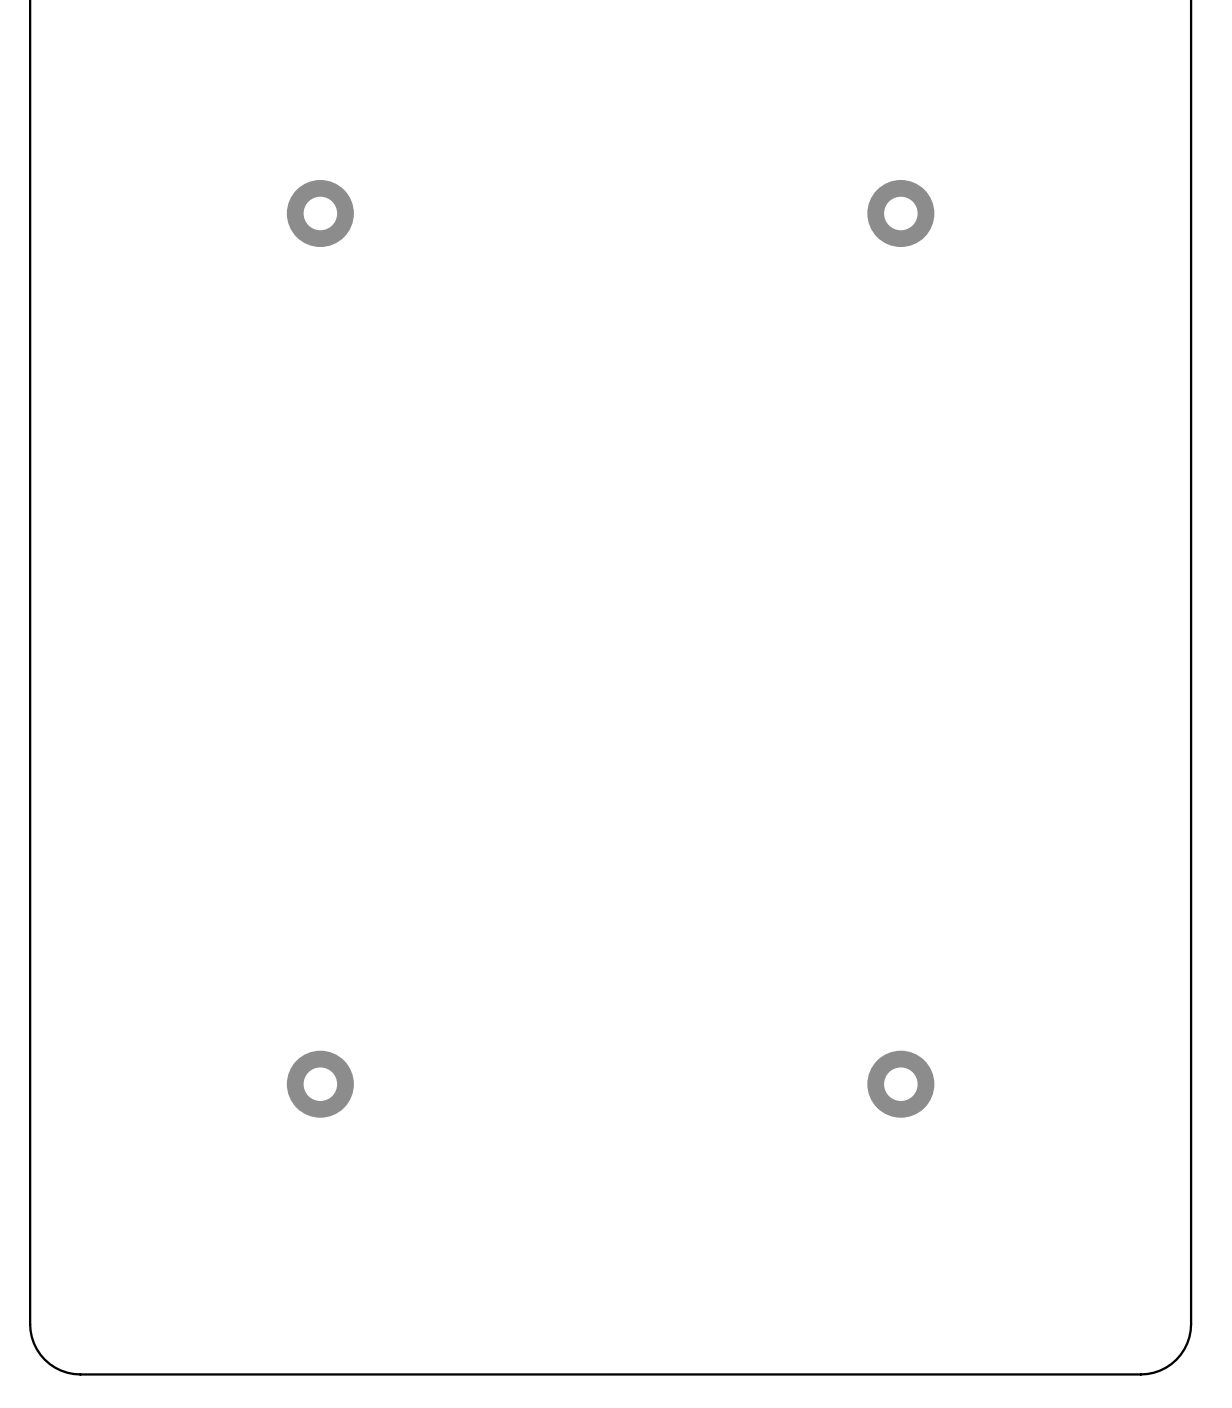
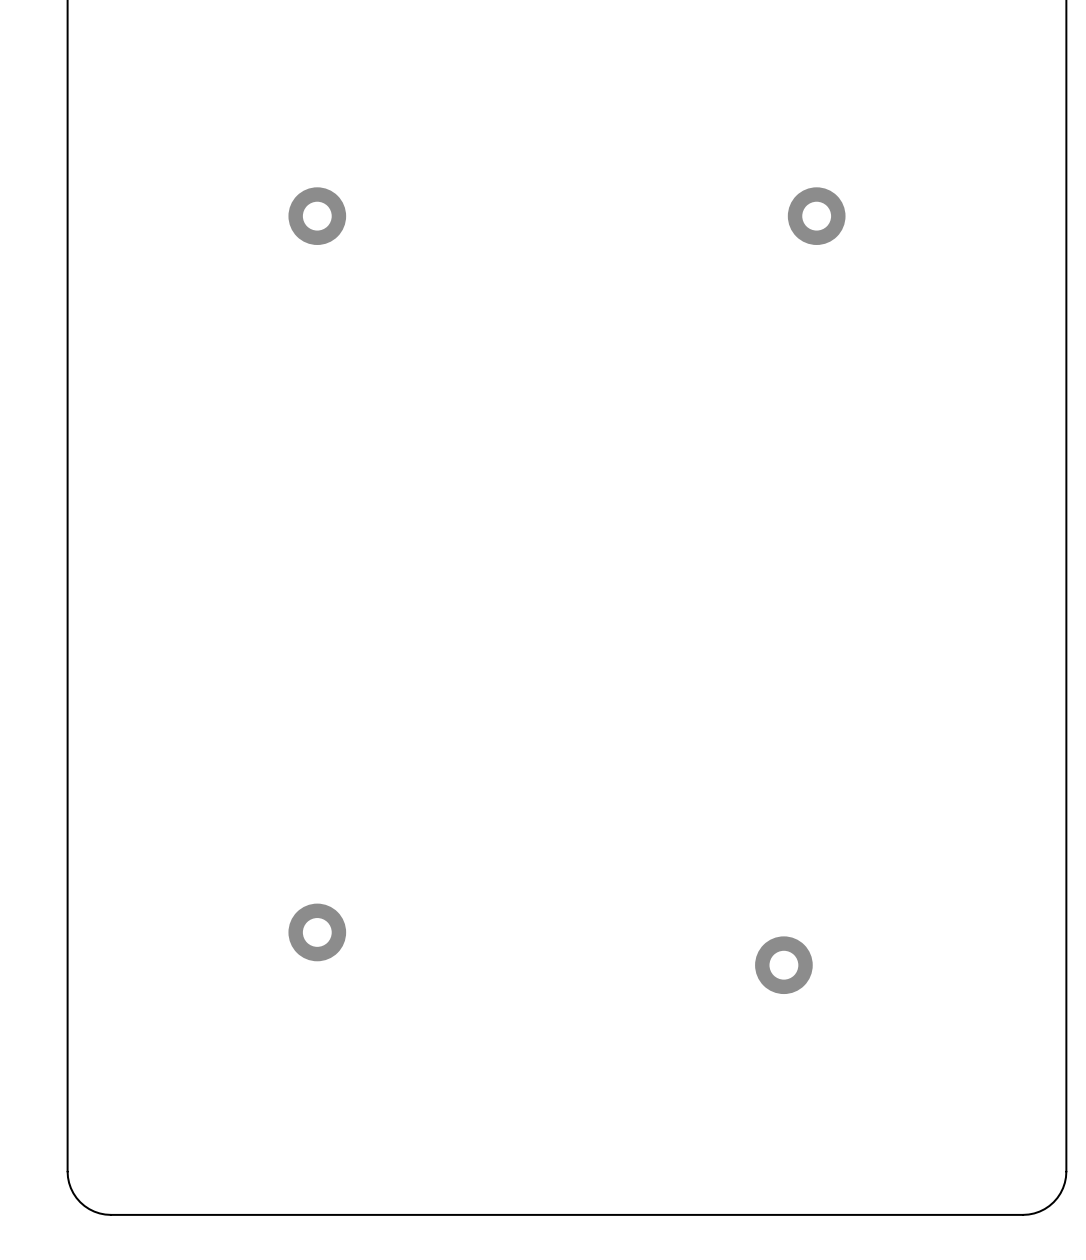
part position: (320, 1084) -> (317, 932)
part position: (900, 1084) -> (783, 965)

